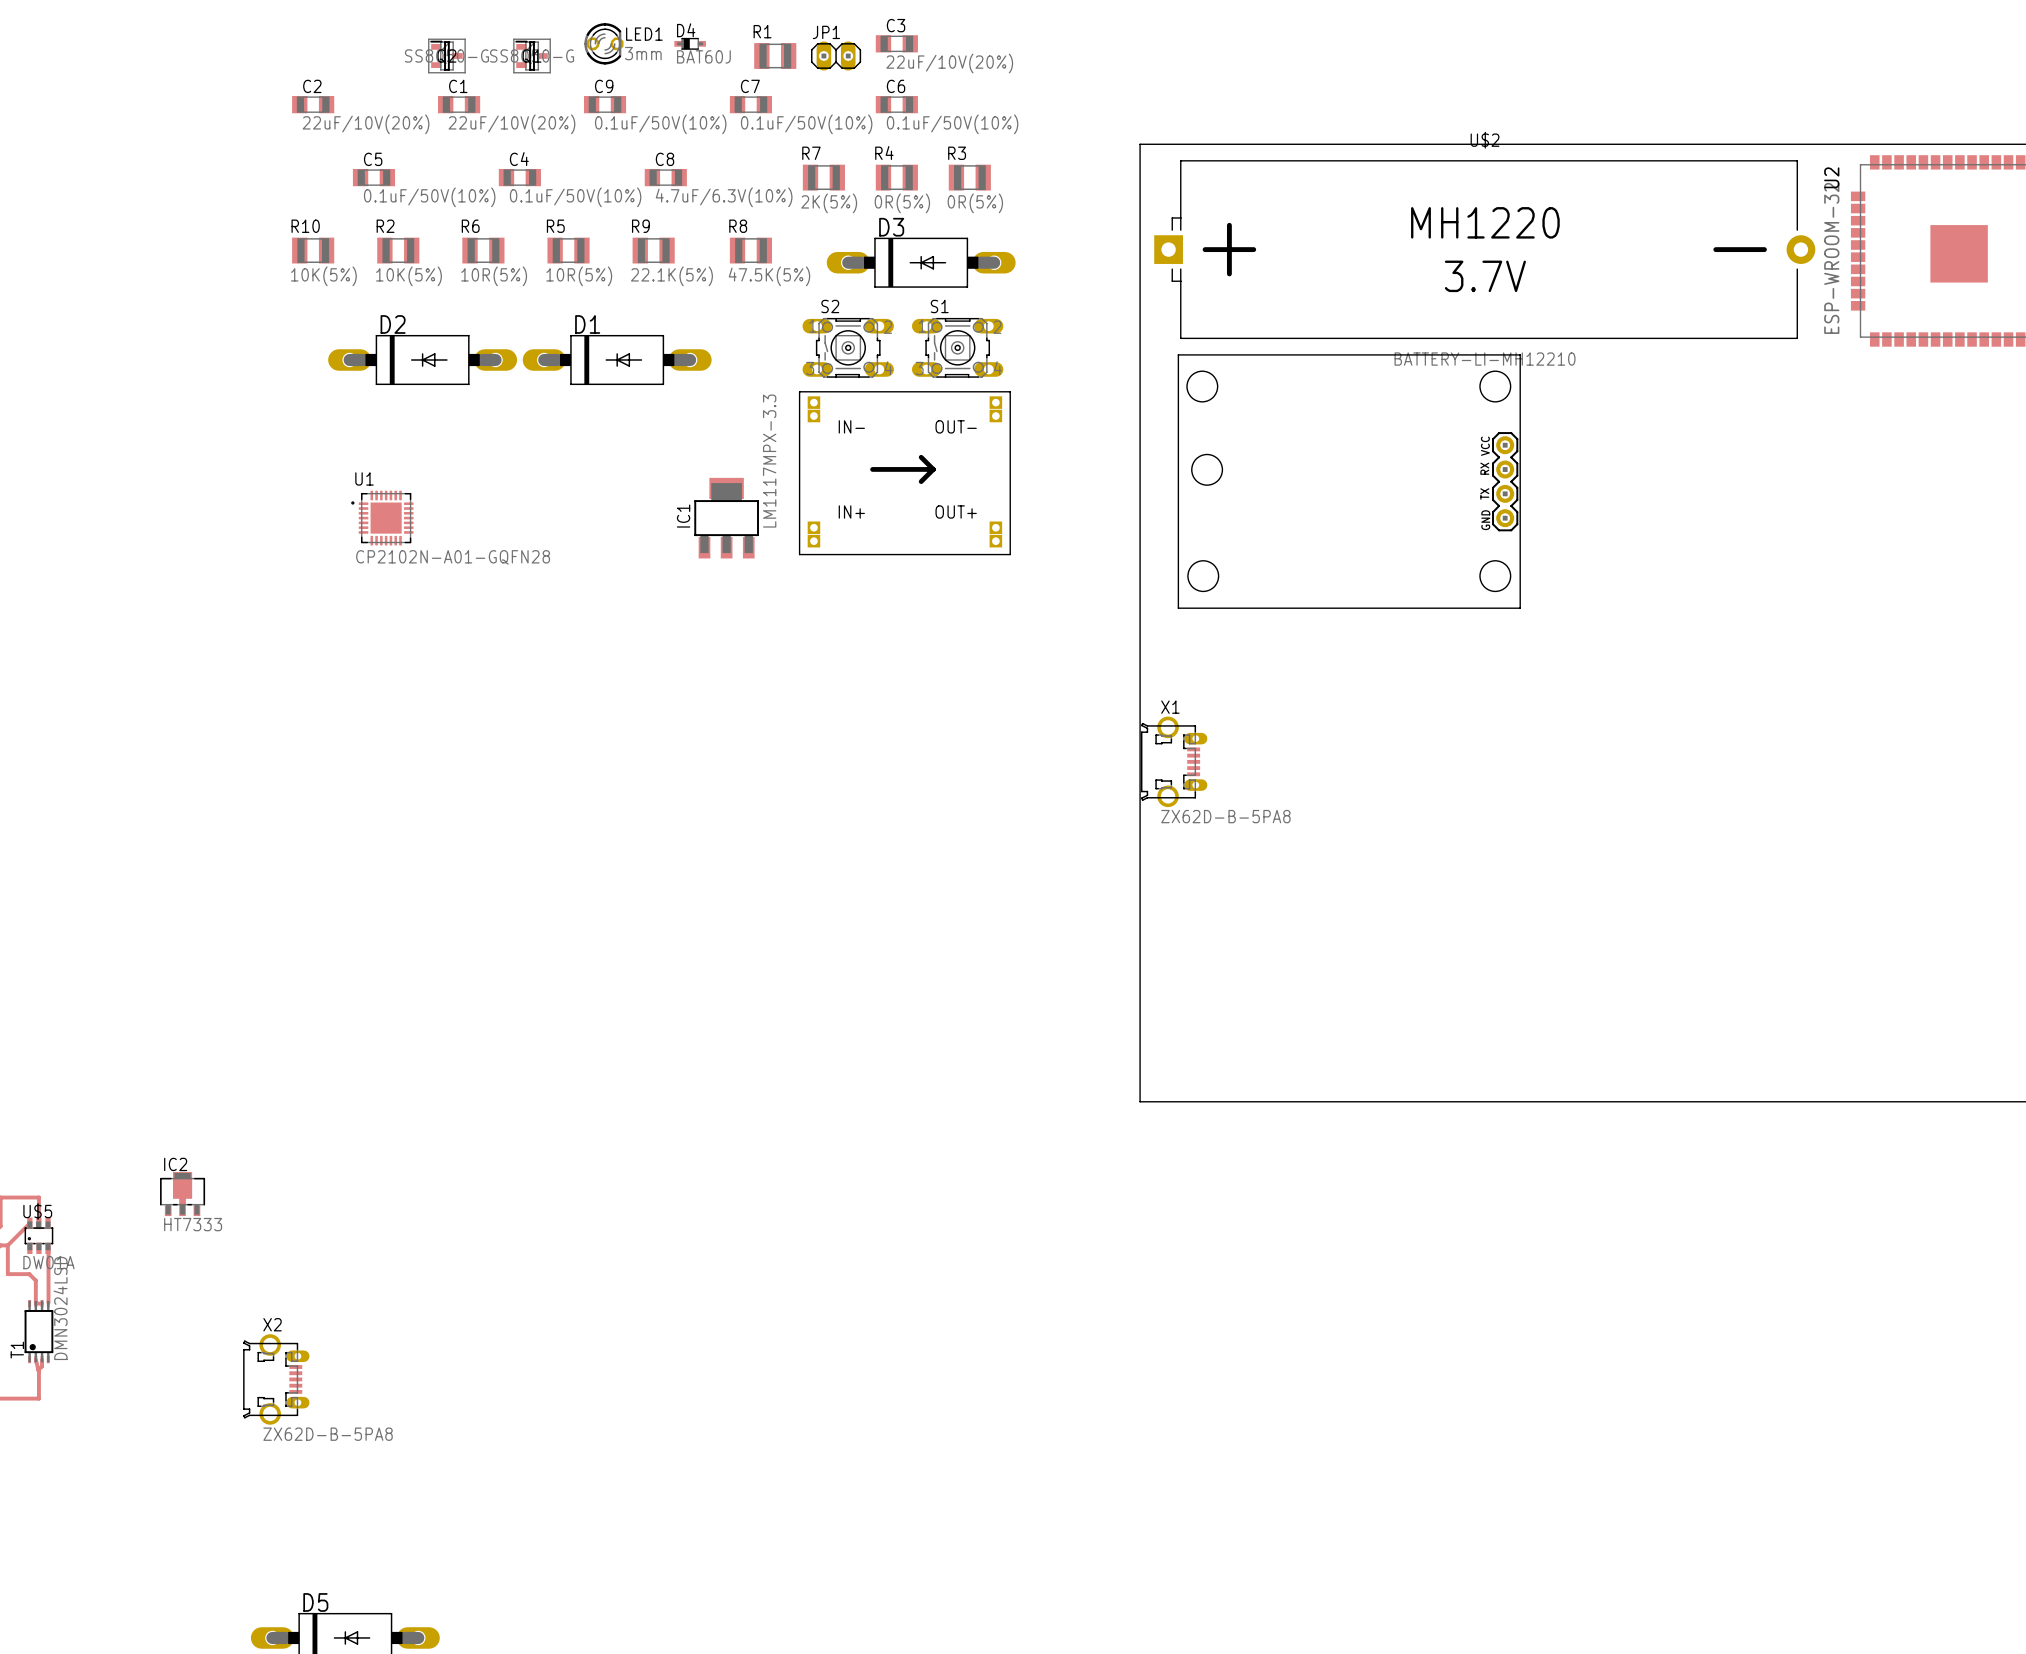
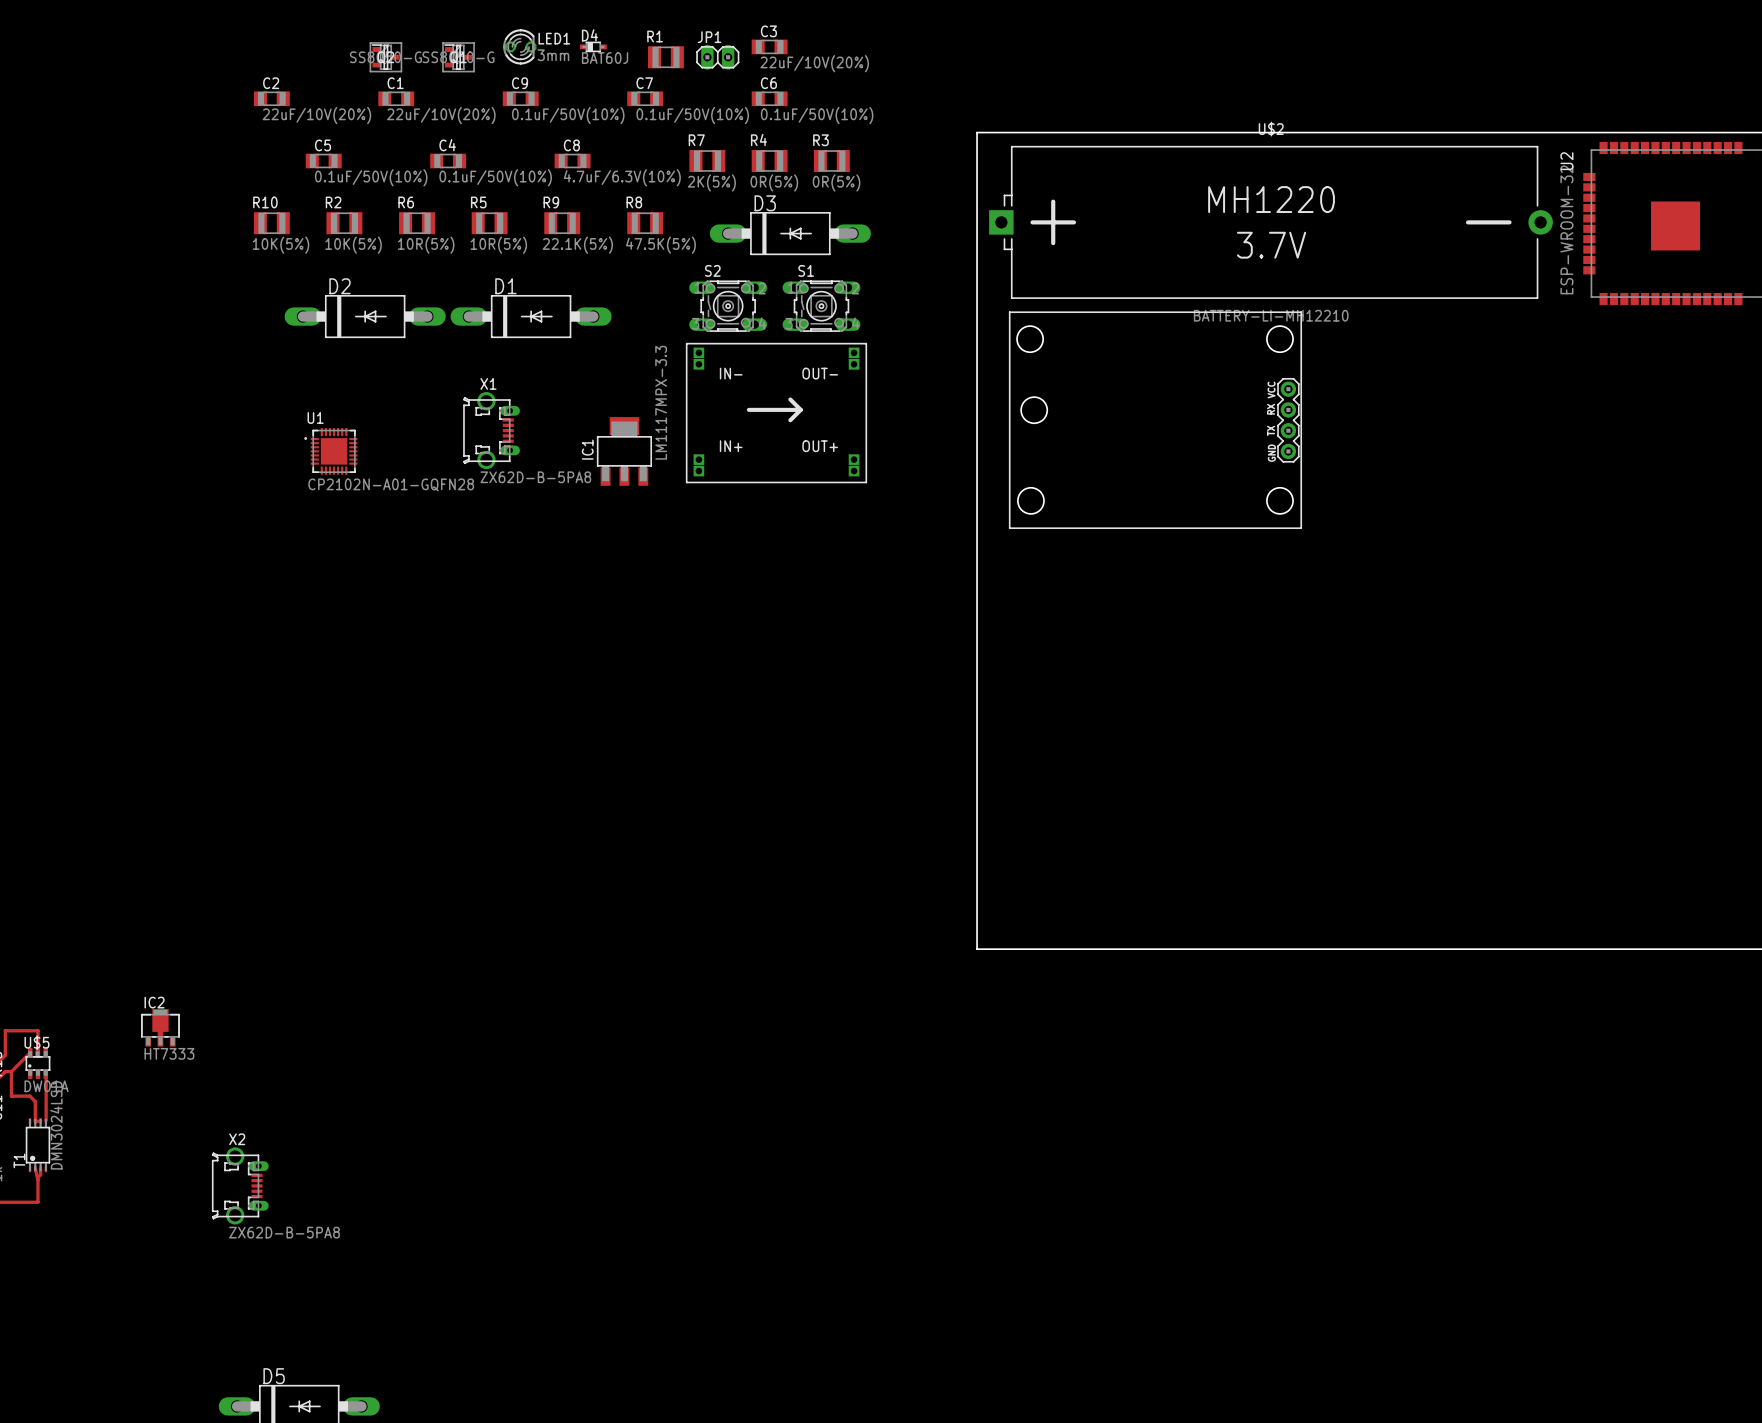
X1 position: (1174, 761) -> (491, 430)

